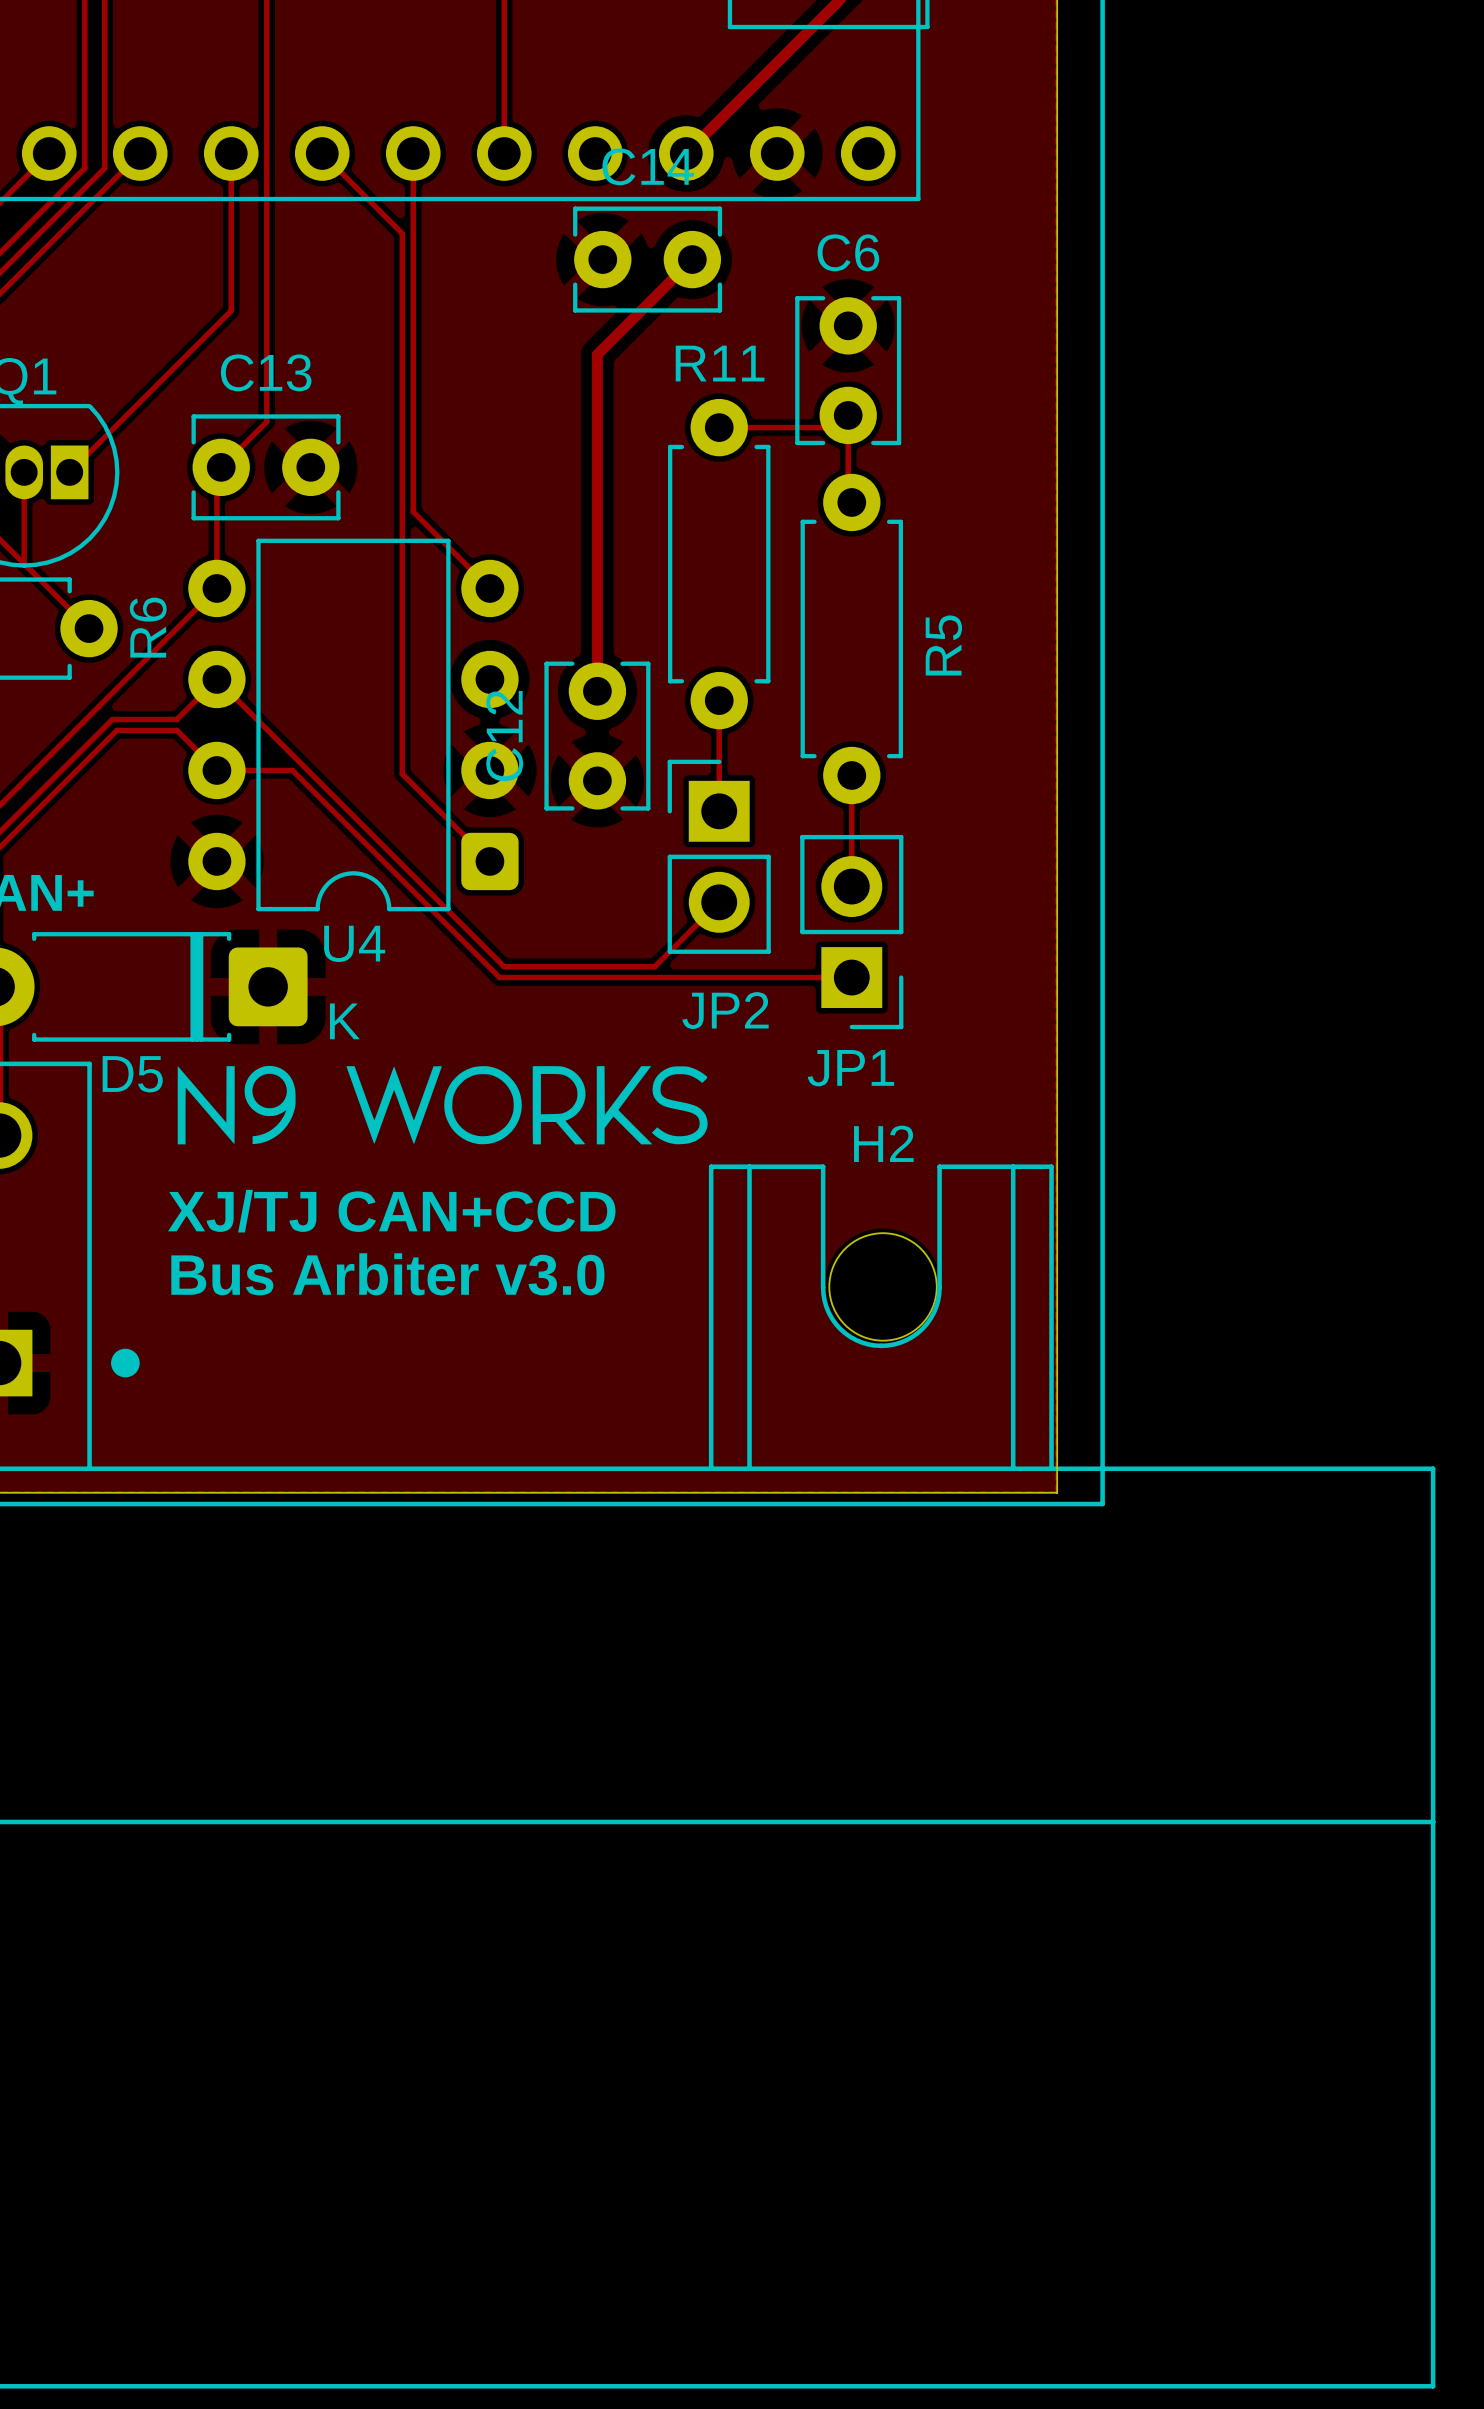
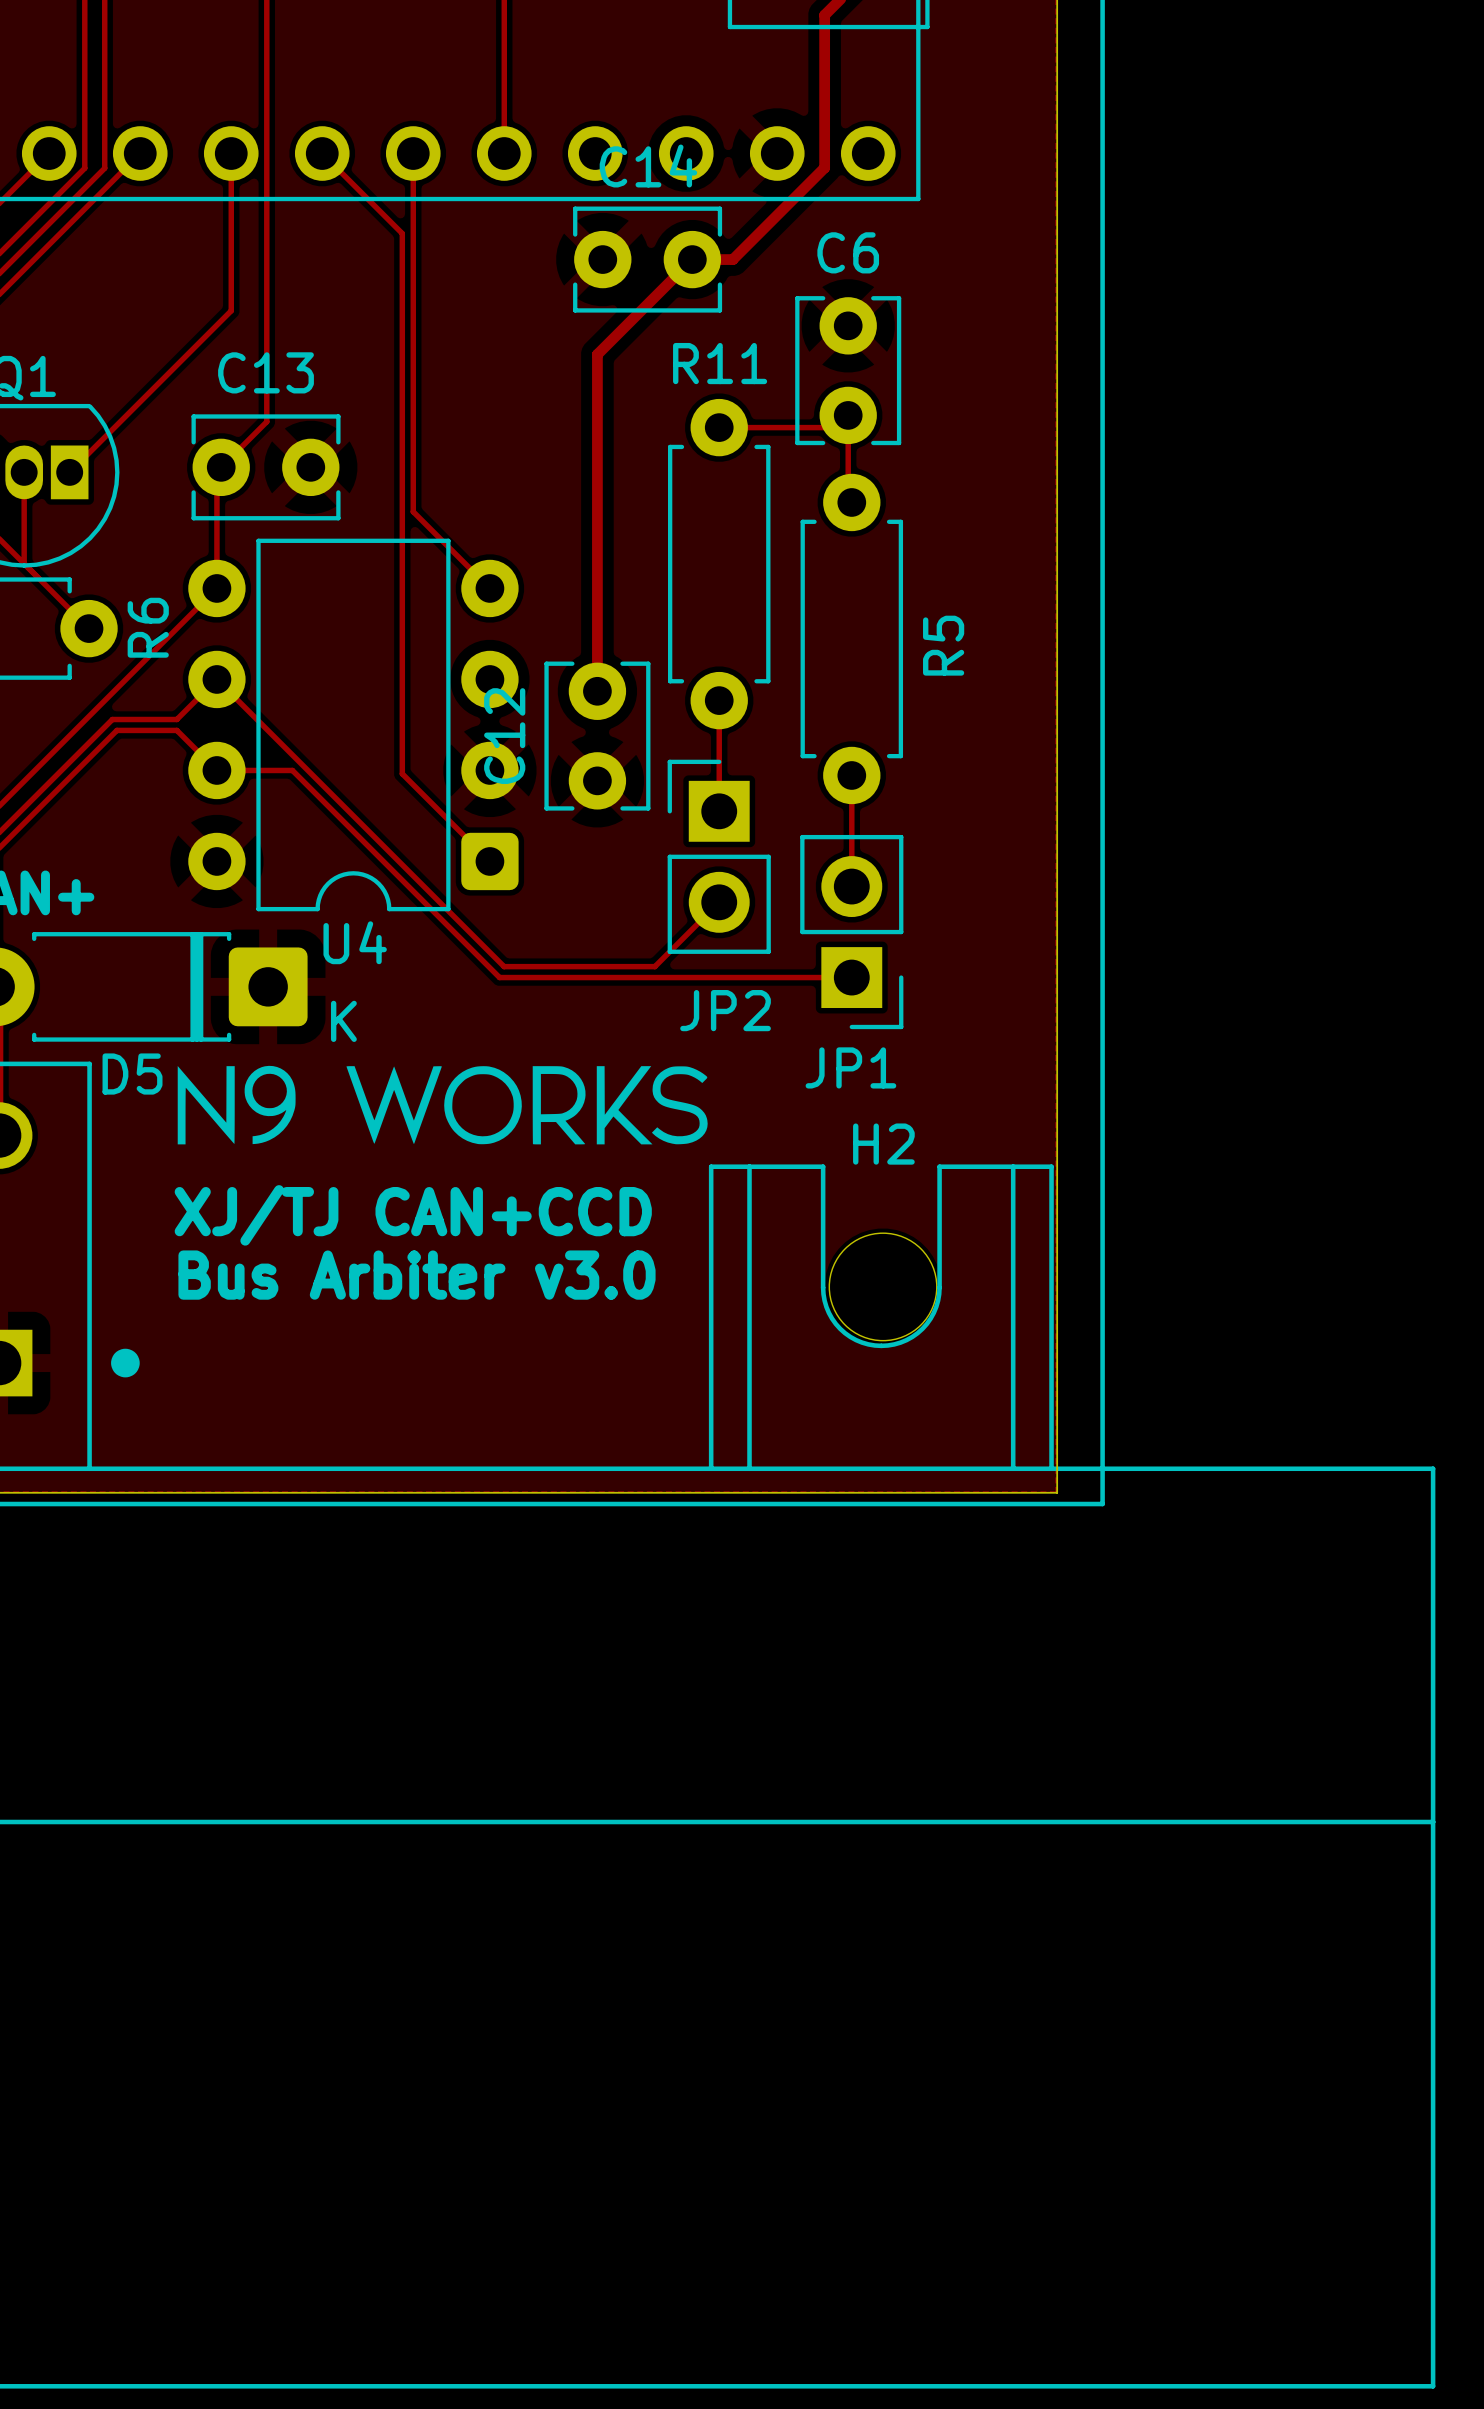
track: (824, 15) (686, 153) -> (824, 15) (824, 167) (732, 259) (692, 259)

